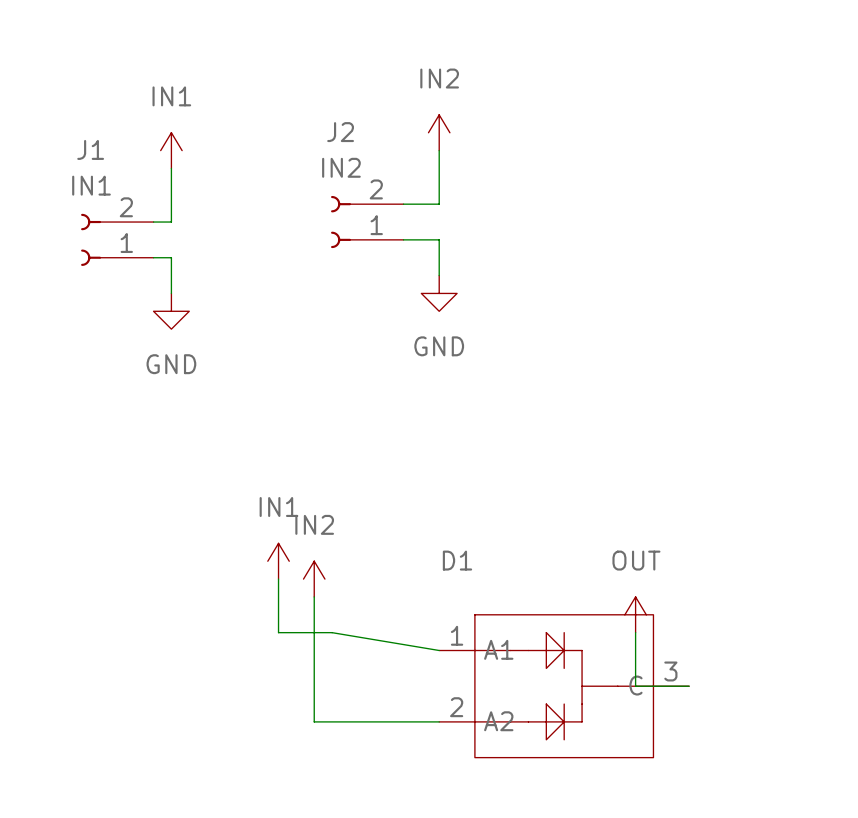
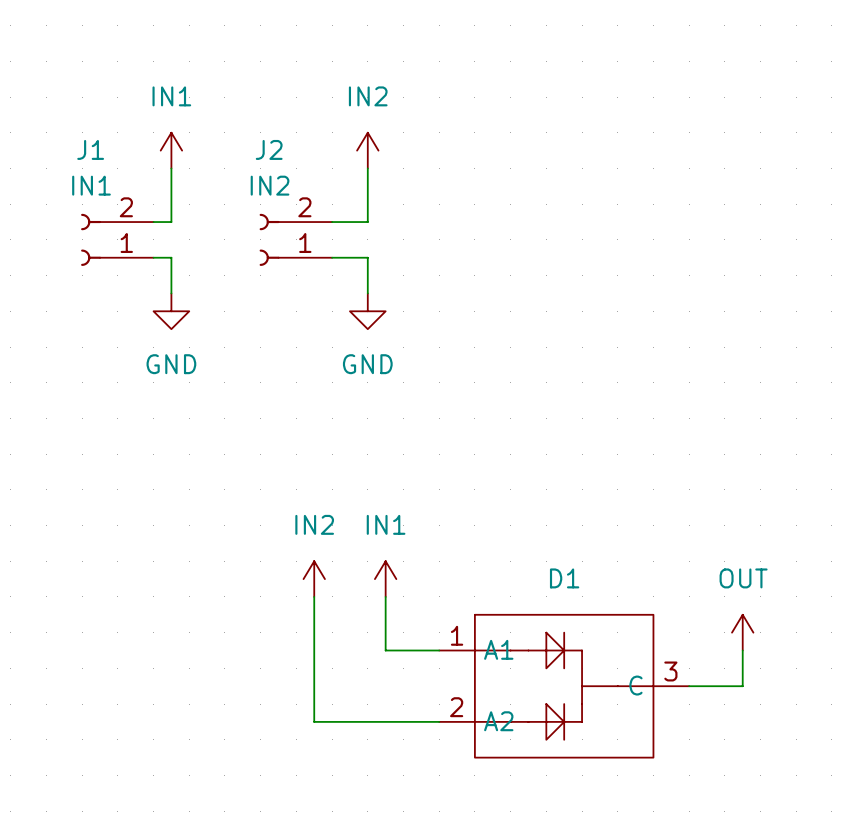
power symbol position: IN2 (439, 132) -> IN2 (367, 150)
wire: (439, 150) (439, 204) (403, 204) -> (367, 168) (367, 222) (332, 222)
J2 position: (367, 222) -> (295, 239)
wire: (403, 239) (439, 239) (439, 275) -> (332, 257) (367, 257) (367, 293)
power symbol position: GND (439, 293) -> GND (367, 311)
D1 name position: D1 (457, 560) -> D1 (564, 578)
power symbol position: IN1 (278, 561) -> IN1 (385, 579)
wire: (278, 579) (278, 632) (332, 632) (439, 650) -> (385, 596) (385, 650) (439, 650)
power symbol position: OUT (635, 614) -> OUT (742, 632)
wire: (635, 632) (635, 686) (689, 686) -> (742, 650) (742, 686) (689, 686)

